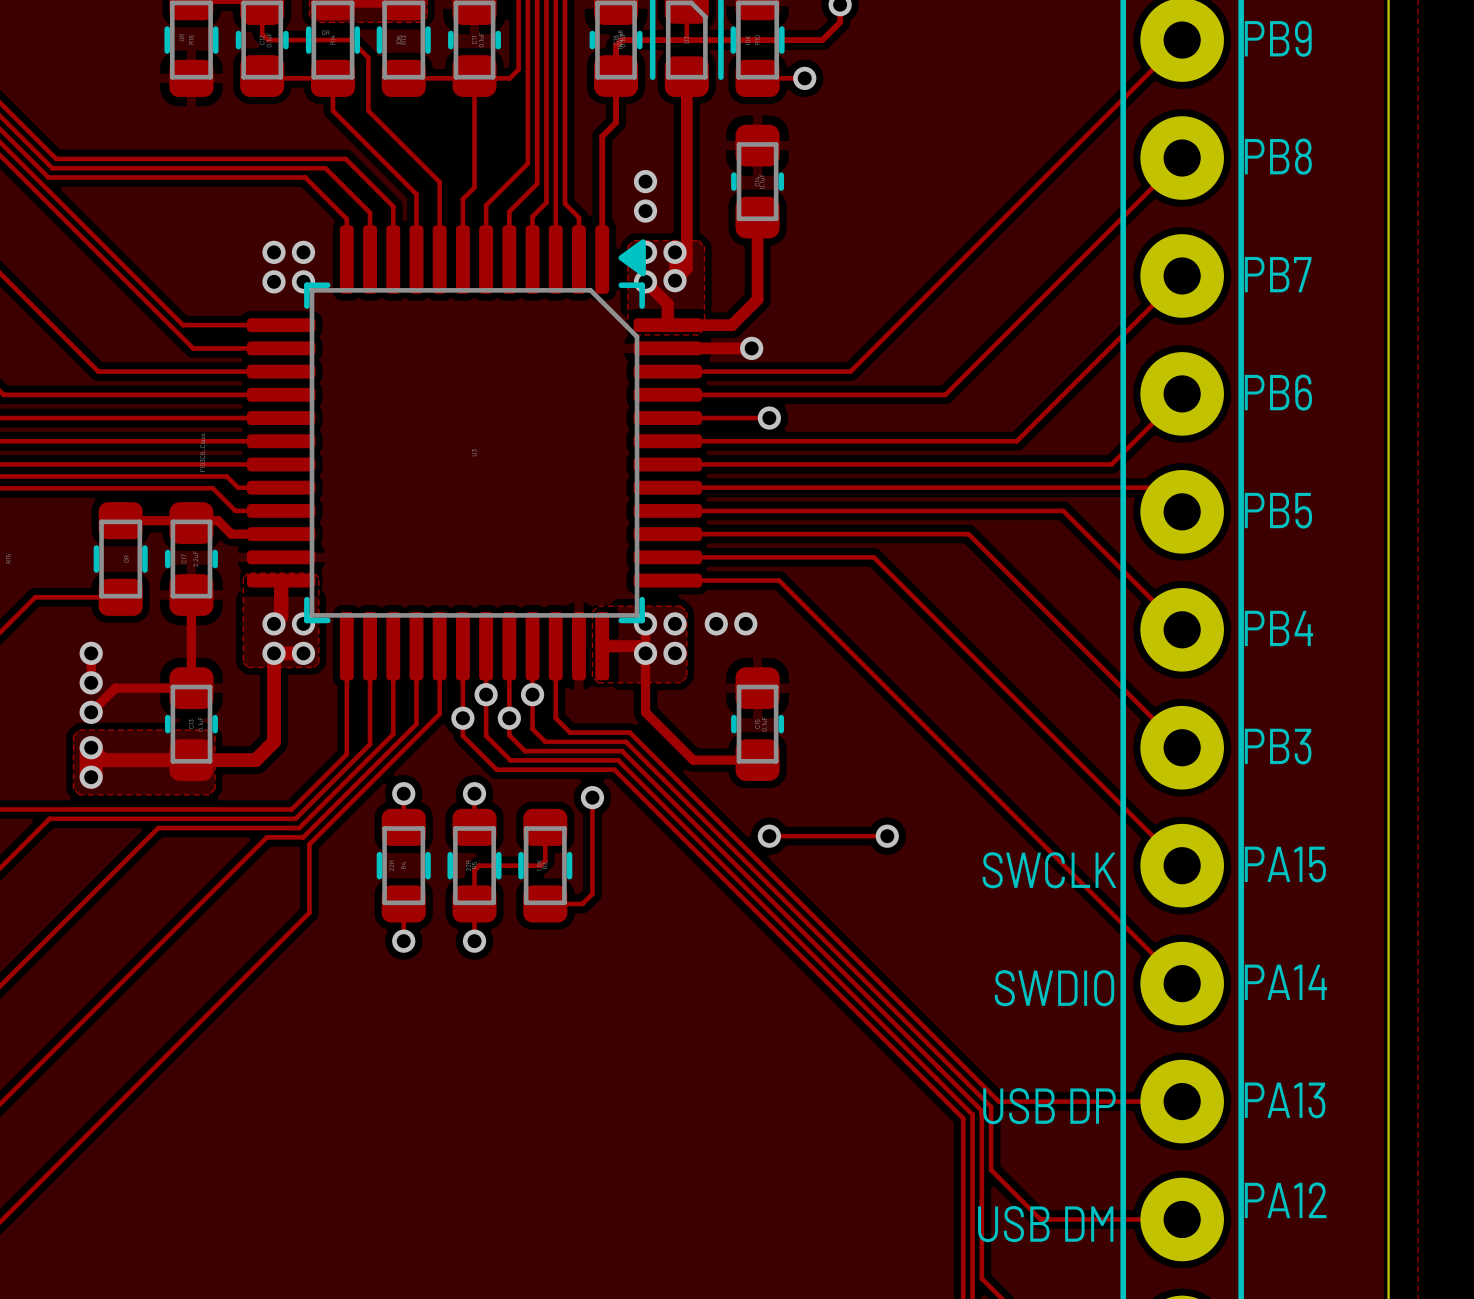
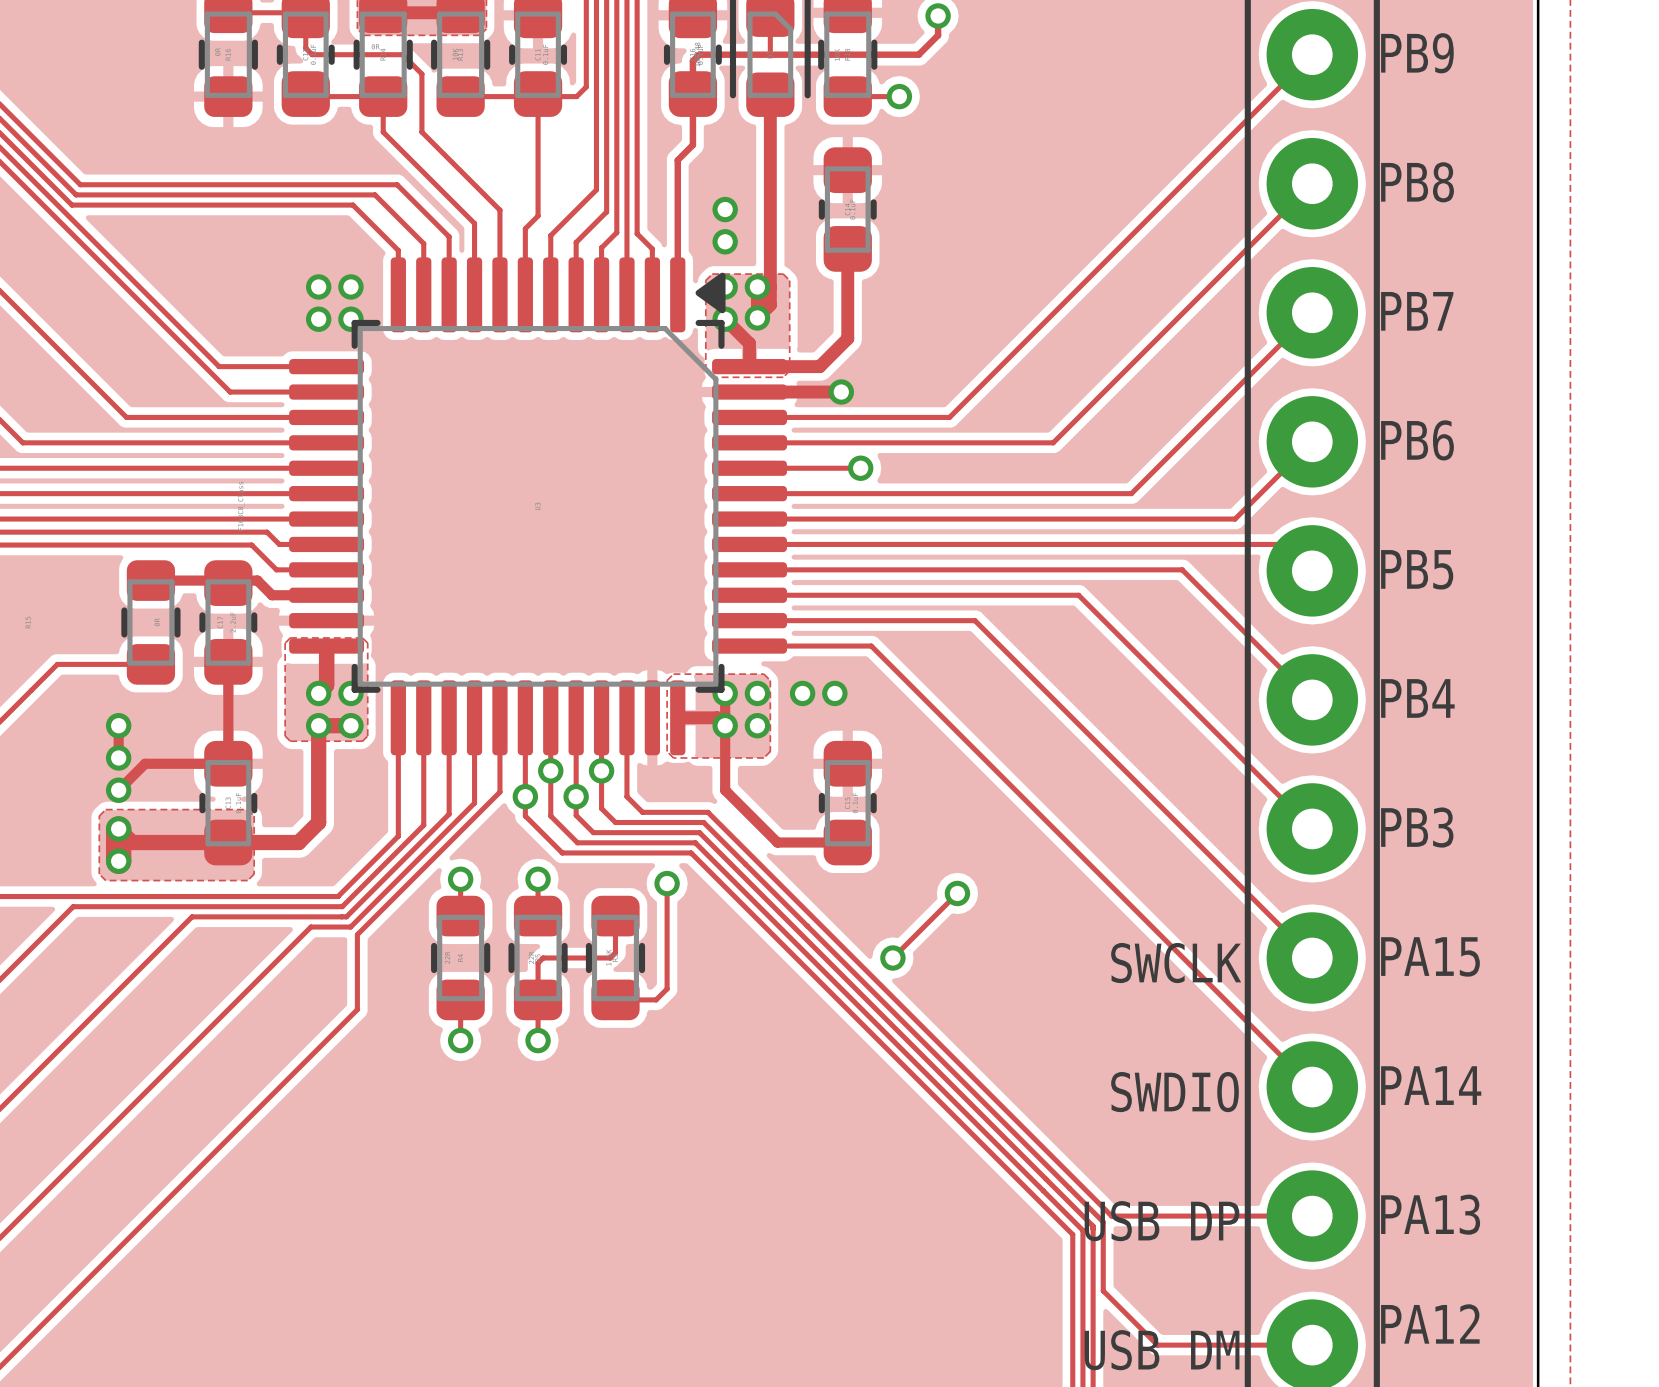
track: none -> (957, 893) (892, 957)
track: (769, 836) (887, 836) -> none
via position: (769, 836) -> (892, 957)
via position: (887, 836) -> (957, 893)

